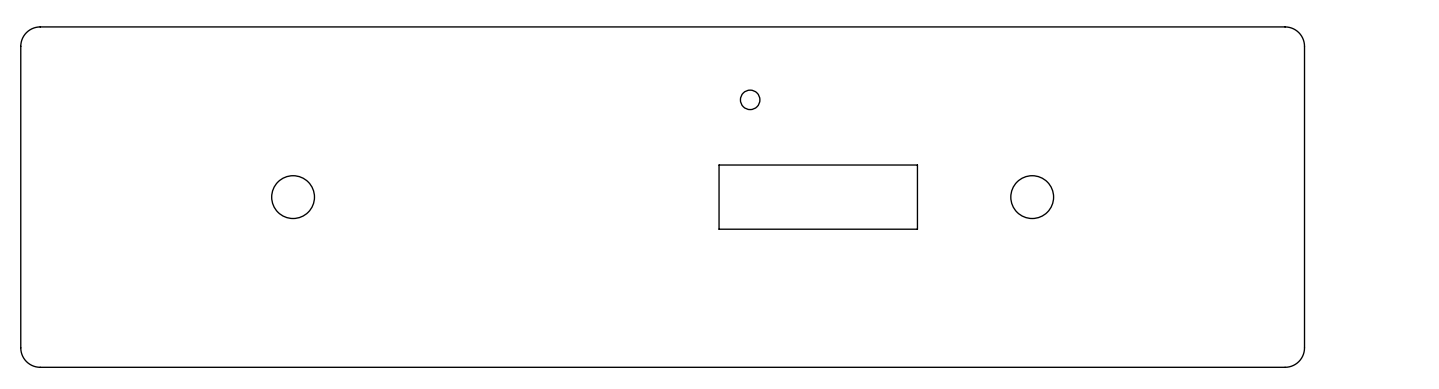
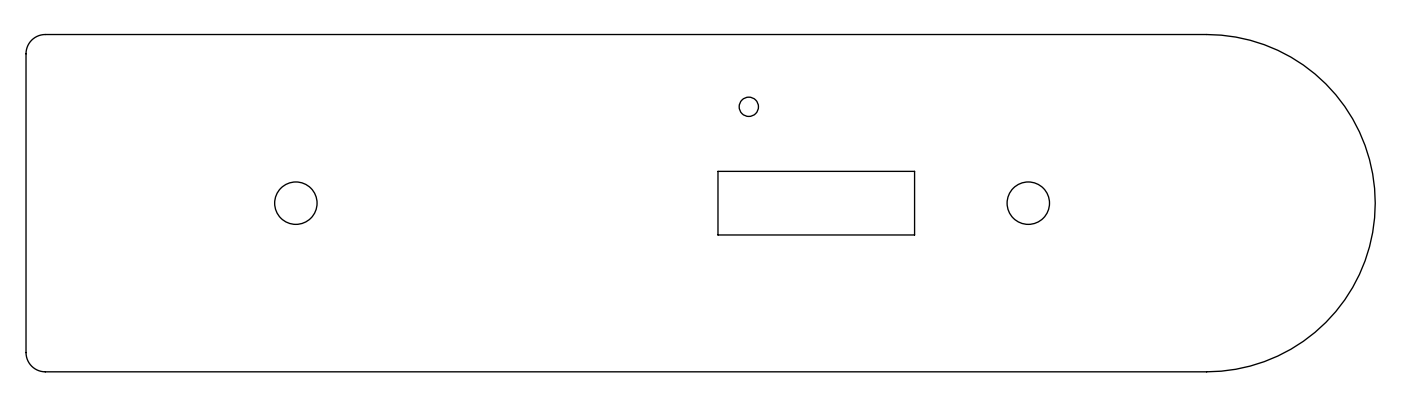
board edge: (1212, 26) (1289, 27) (1300, 34) (1304, 46) (1304, 352) (1298, 361) (1287, 367) (1212, 367) -> (1206, 34) (1235, 37) (1277, 50) (1303, 65) (1325, 83) (1344, 106) (1365, 145) (1372, 173) (1375, 203) (1372, 232) (1365, 260) (1344, 299) (1325, 322) (1303, 341) (1277, 356) (1235, 369) (1206, 371)

